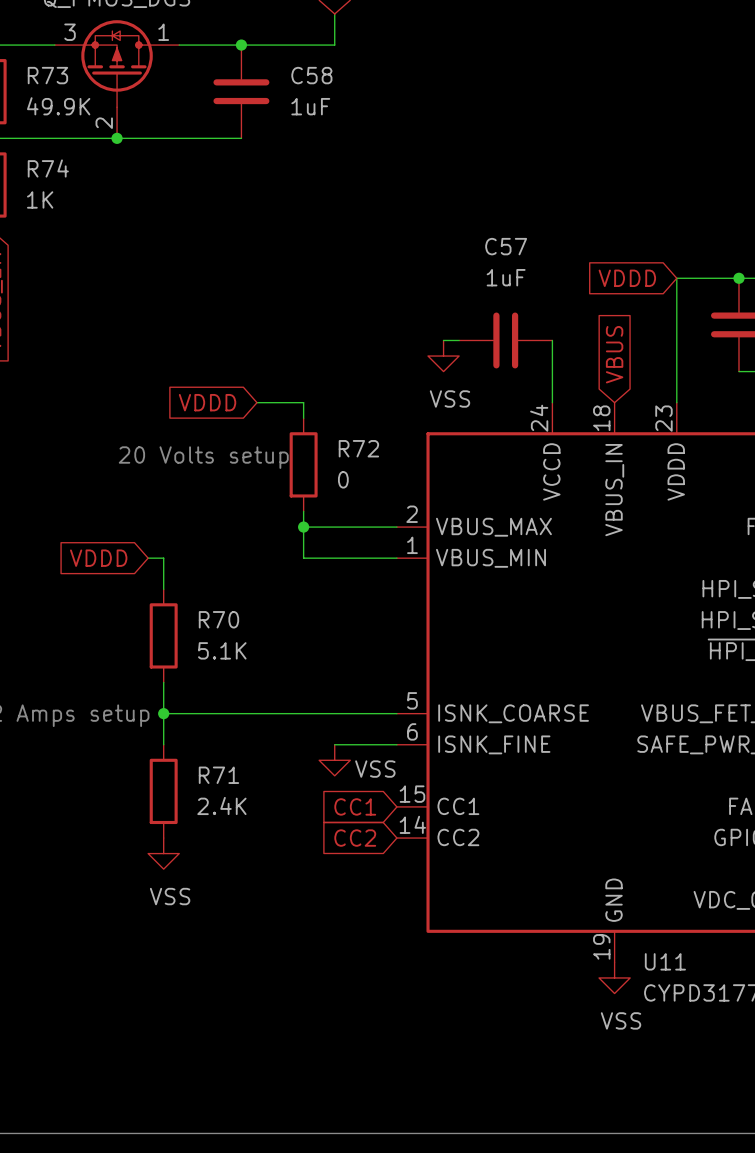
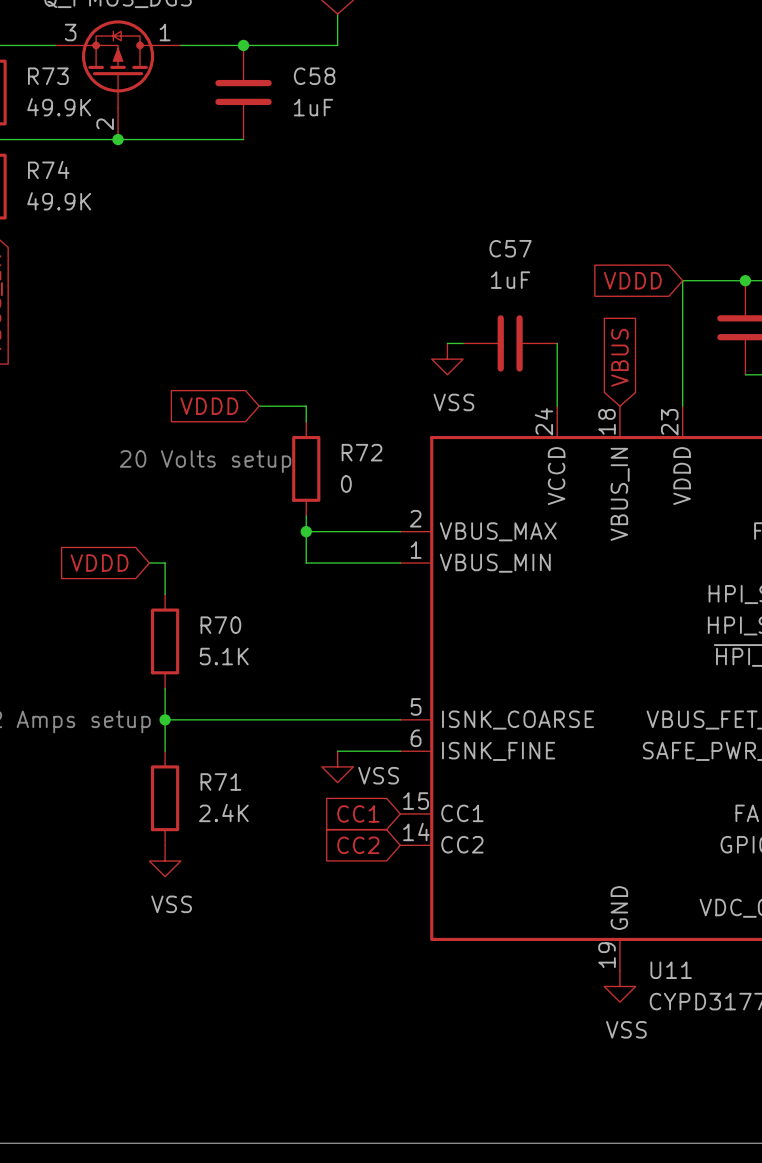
R74 value: 1K (40, 199) -> 49.9K (59, 201)

